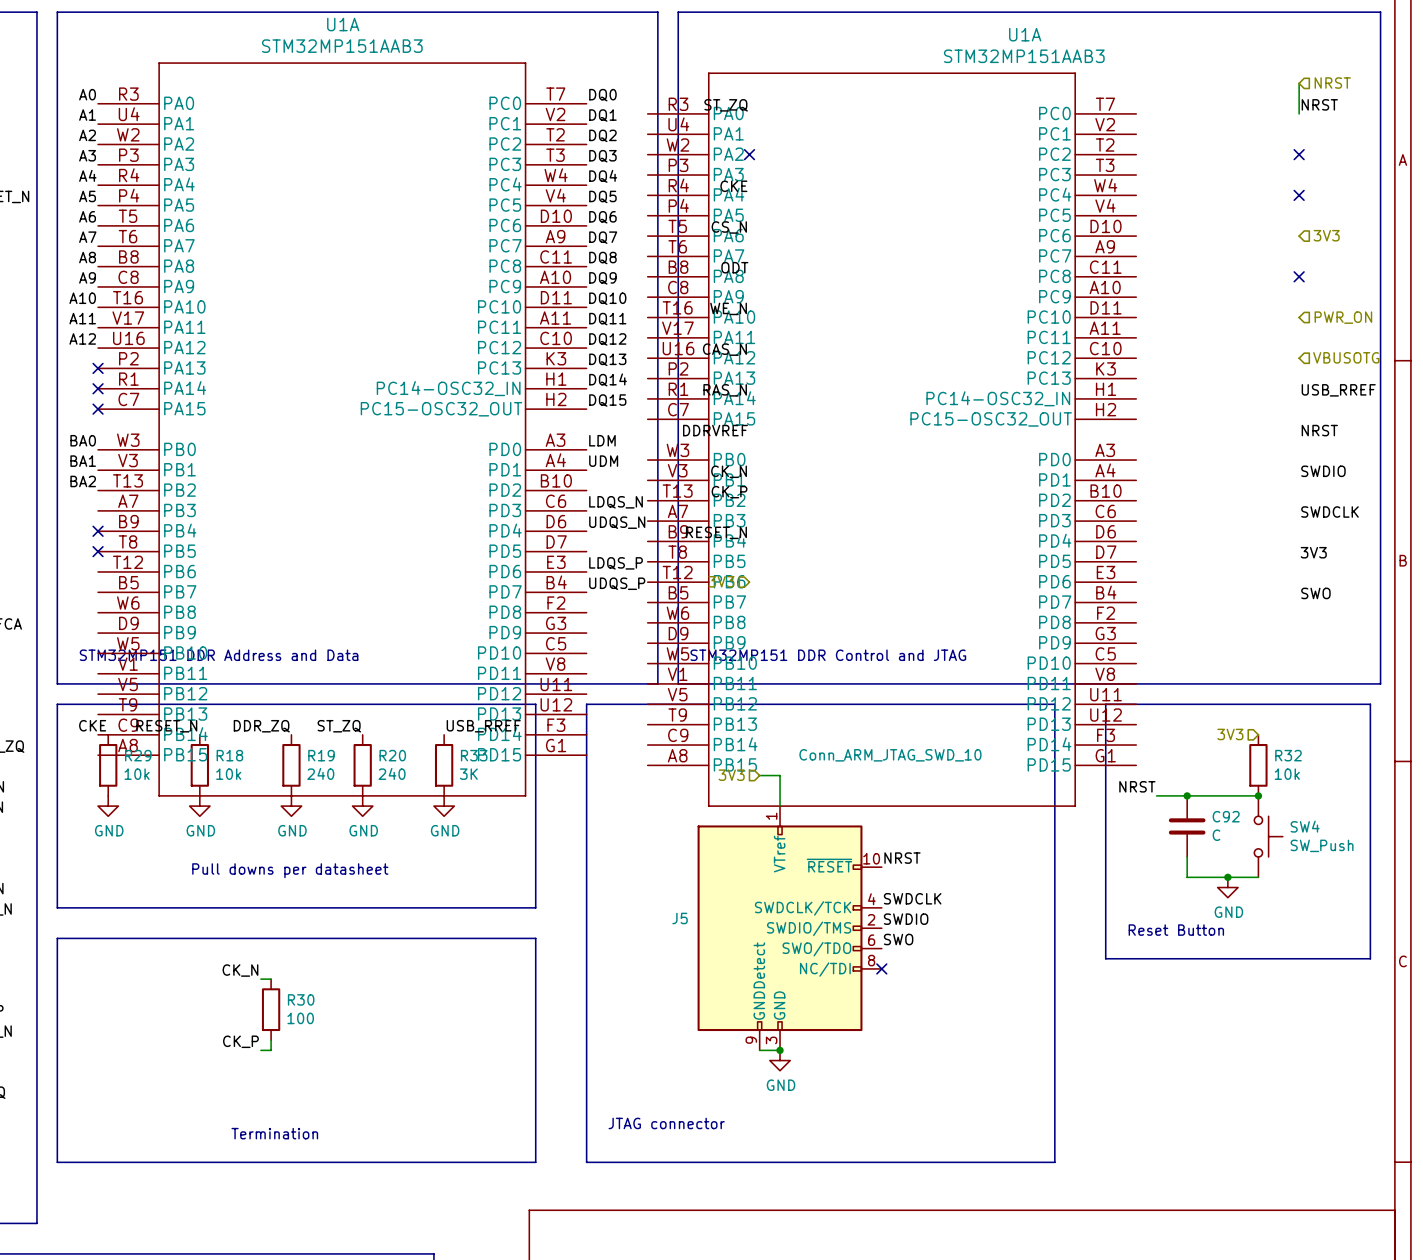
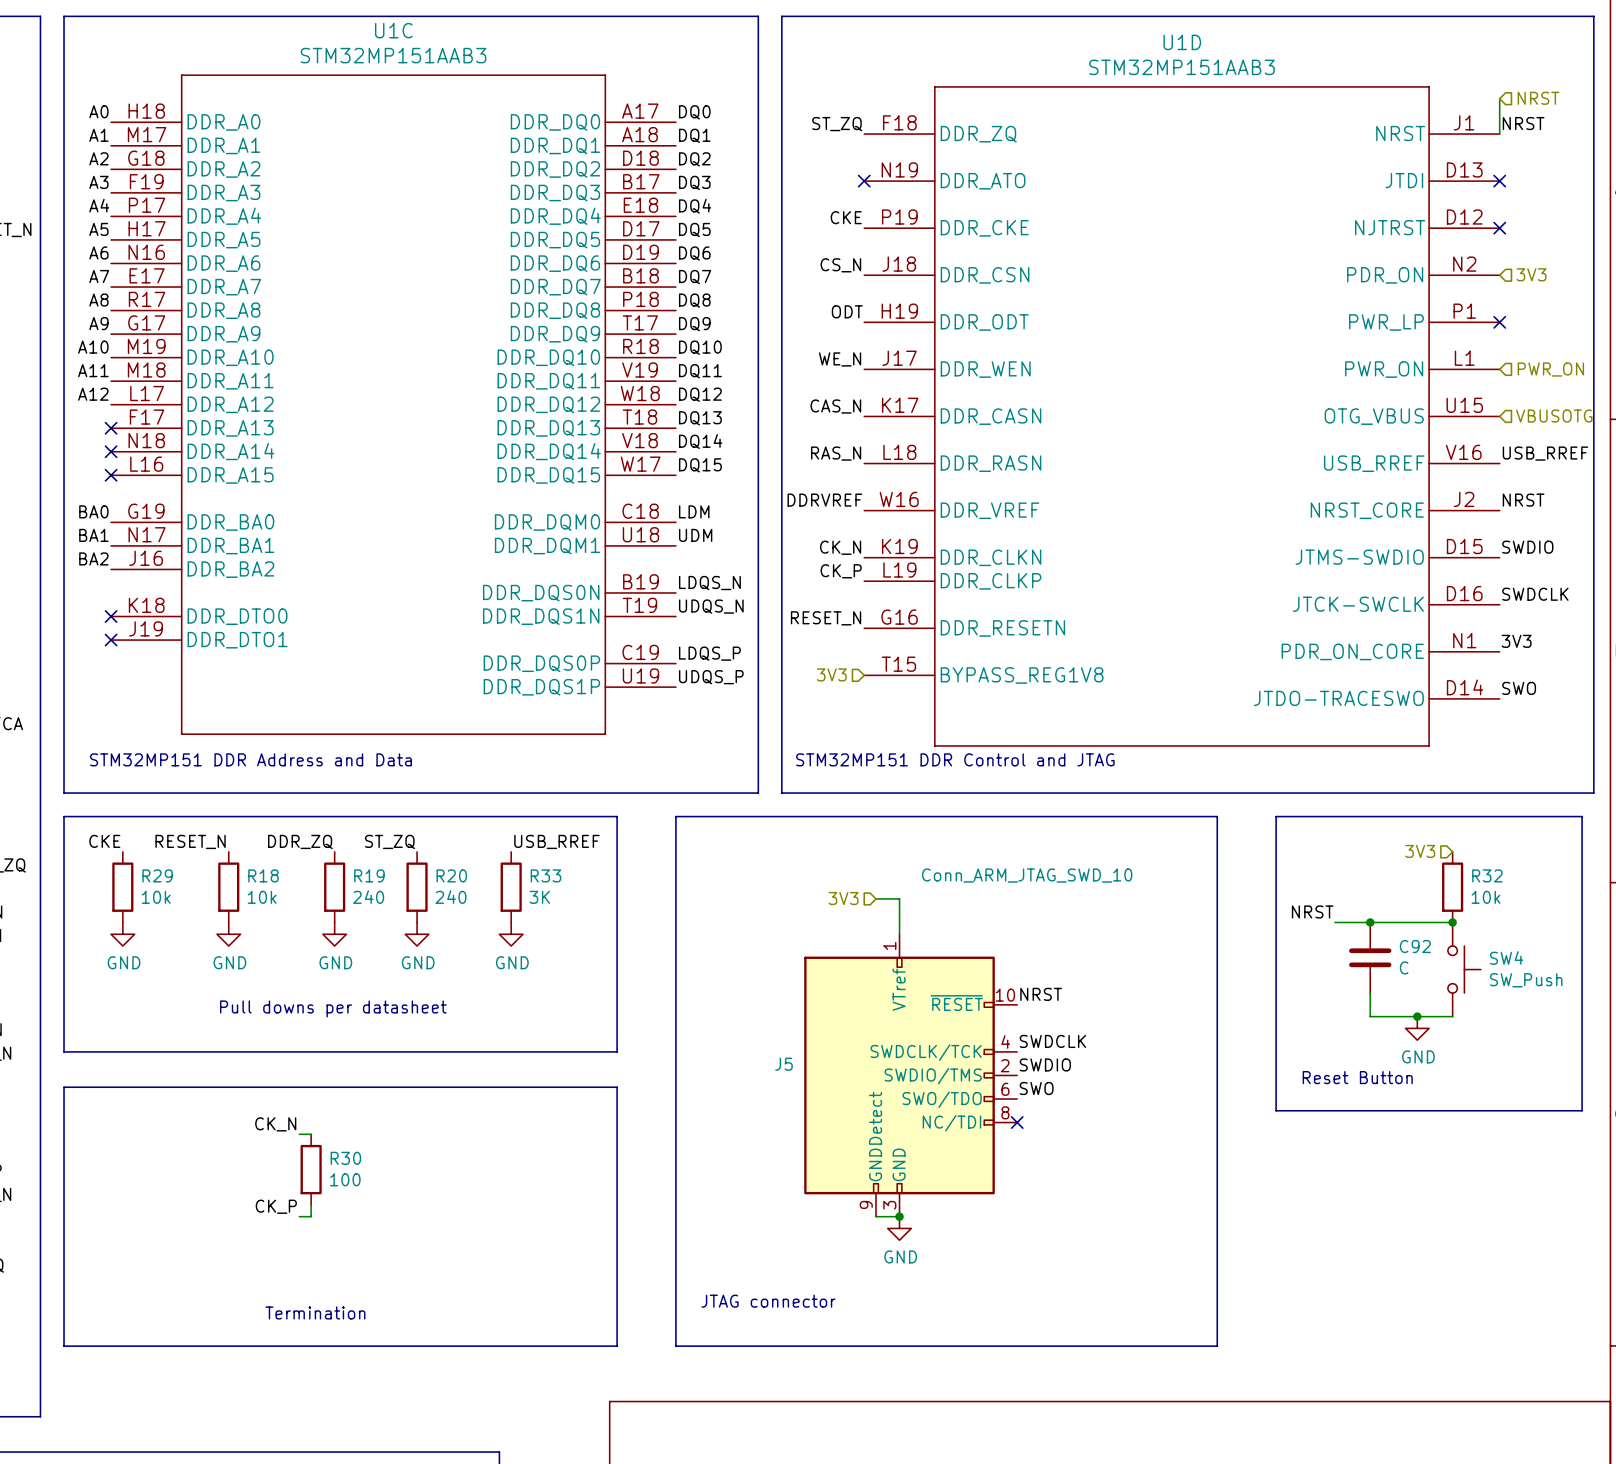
U1C: none -> STM32MP151AAB3 (393, 404)
U1D: none -> STM32MP151AAB3 (1181, 416)
U1A: STM32MP151AAB3 (342, 429) -> none
U1A: STM32MP151AAB3 (891, 439) -> none

